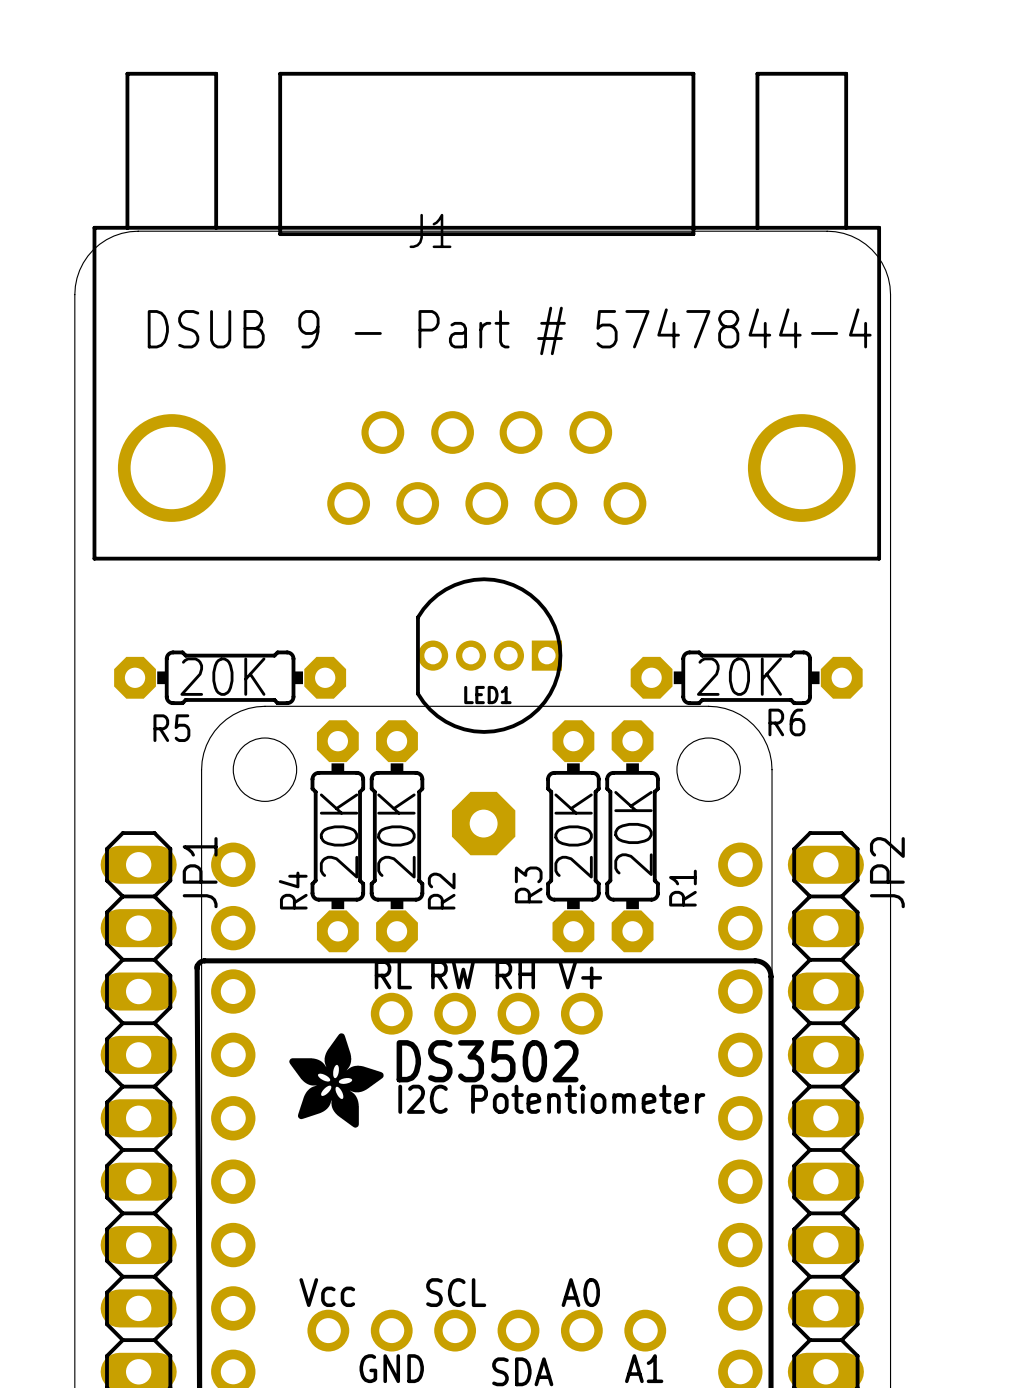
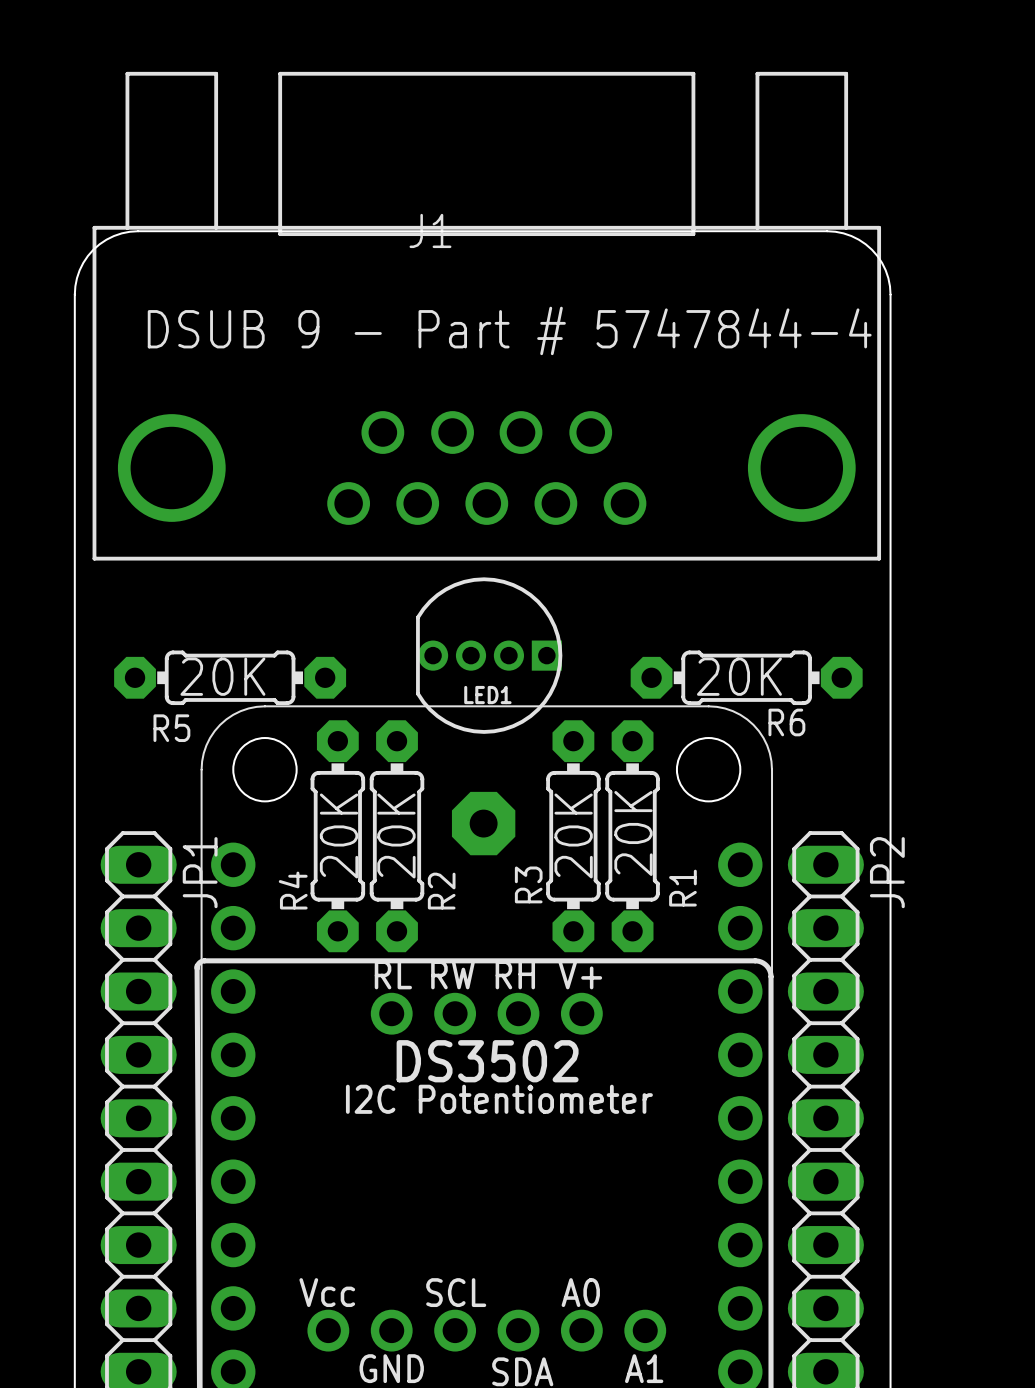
drawing: [289, 1033, 384, 1128] -> none
text position: I2C Potentiometer (551, 1099) -> I2C Potentiometer (499, 1099)

